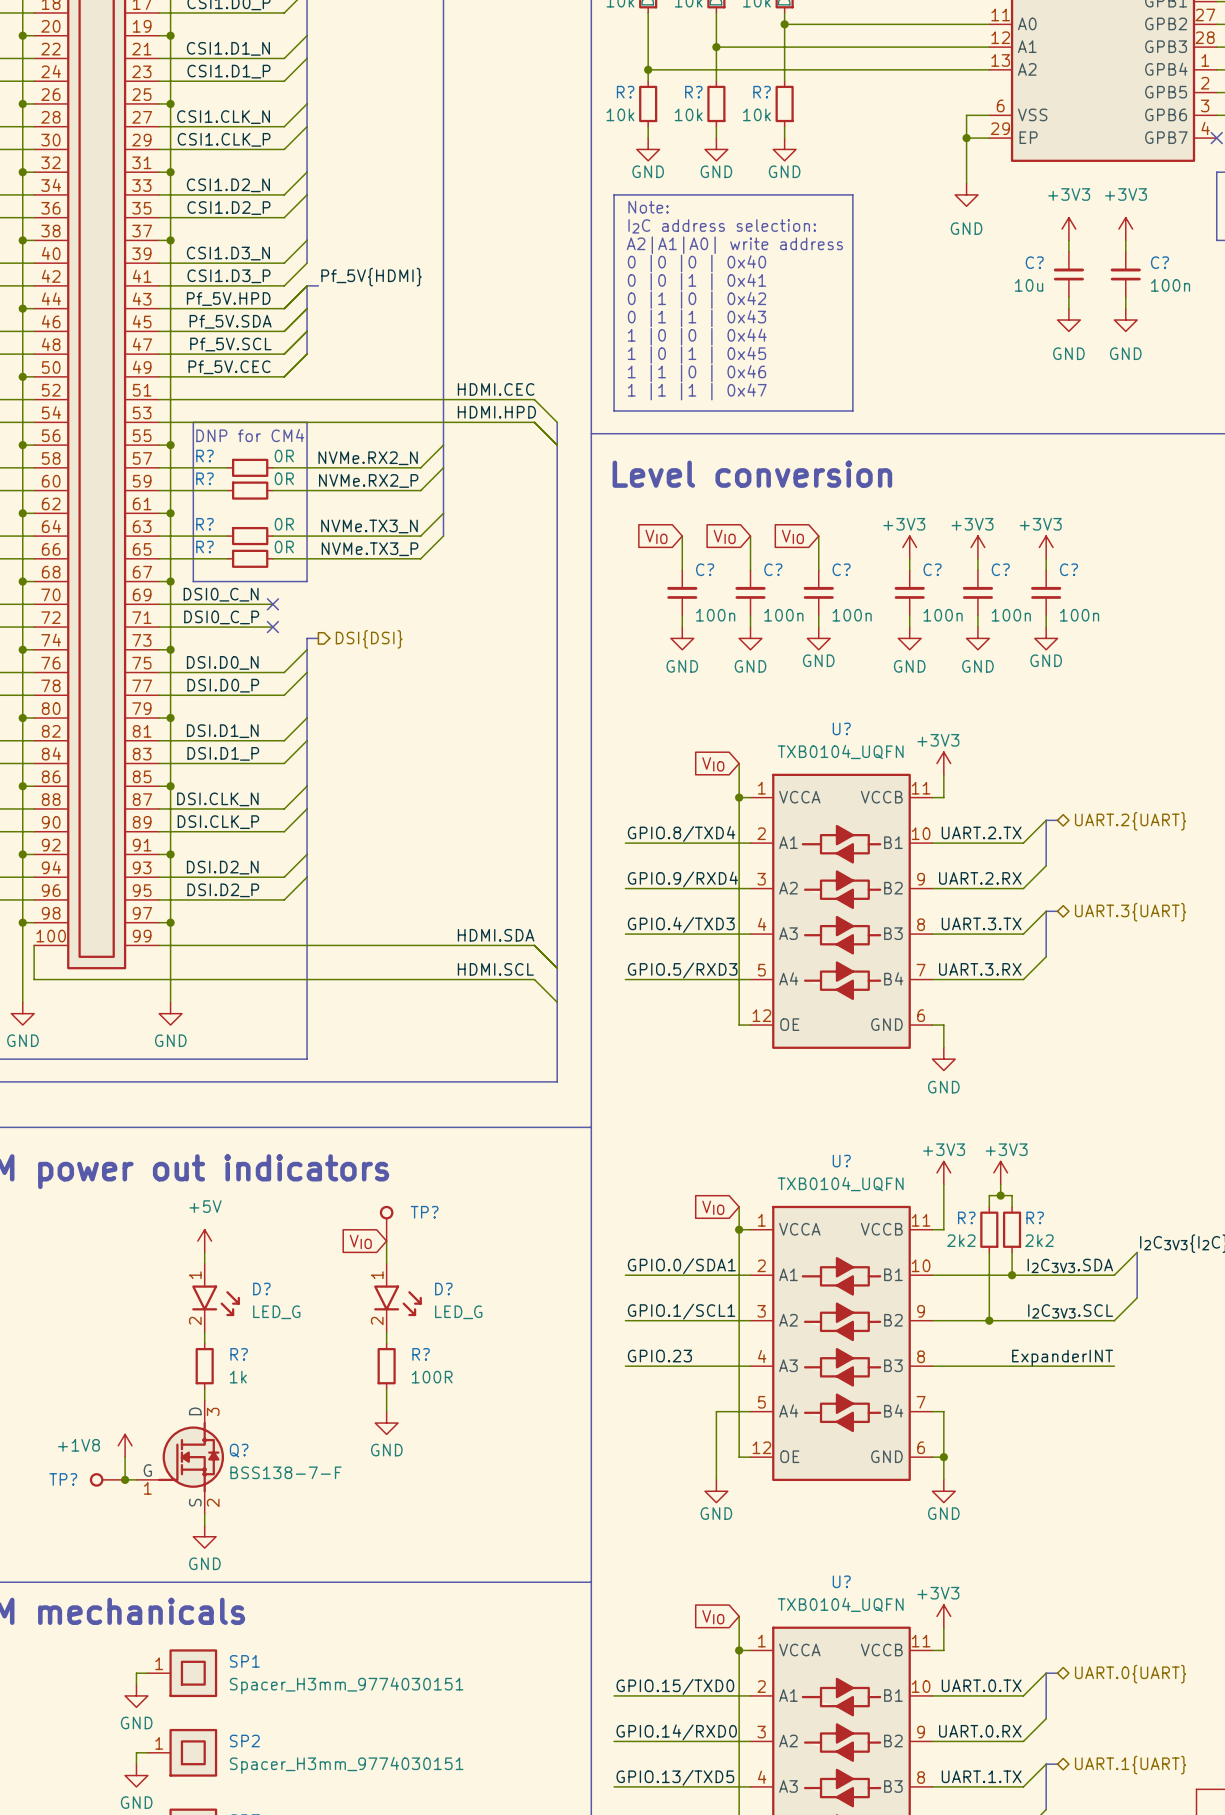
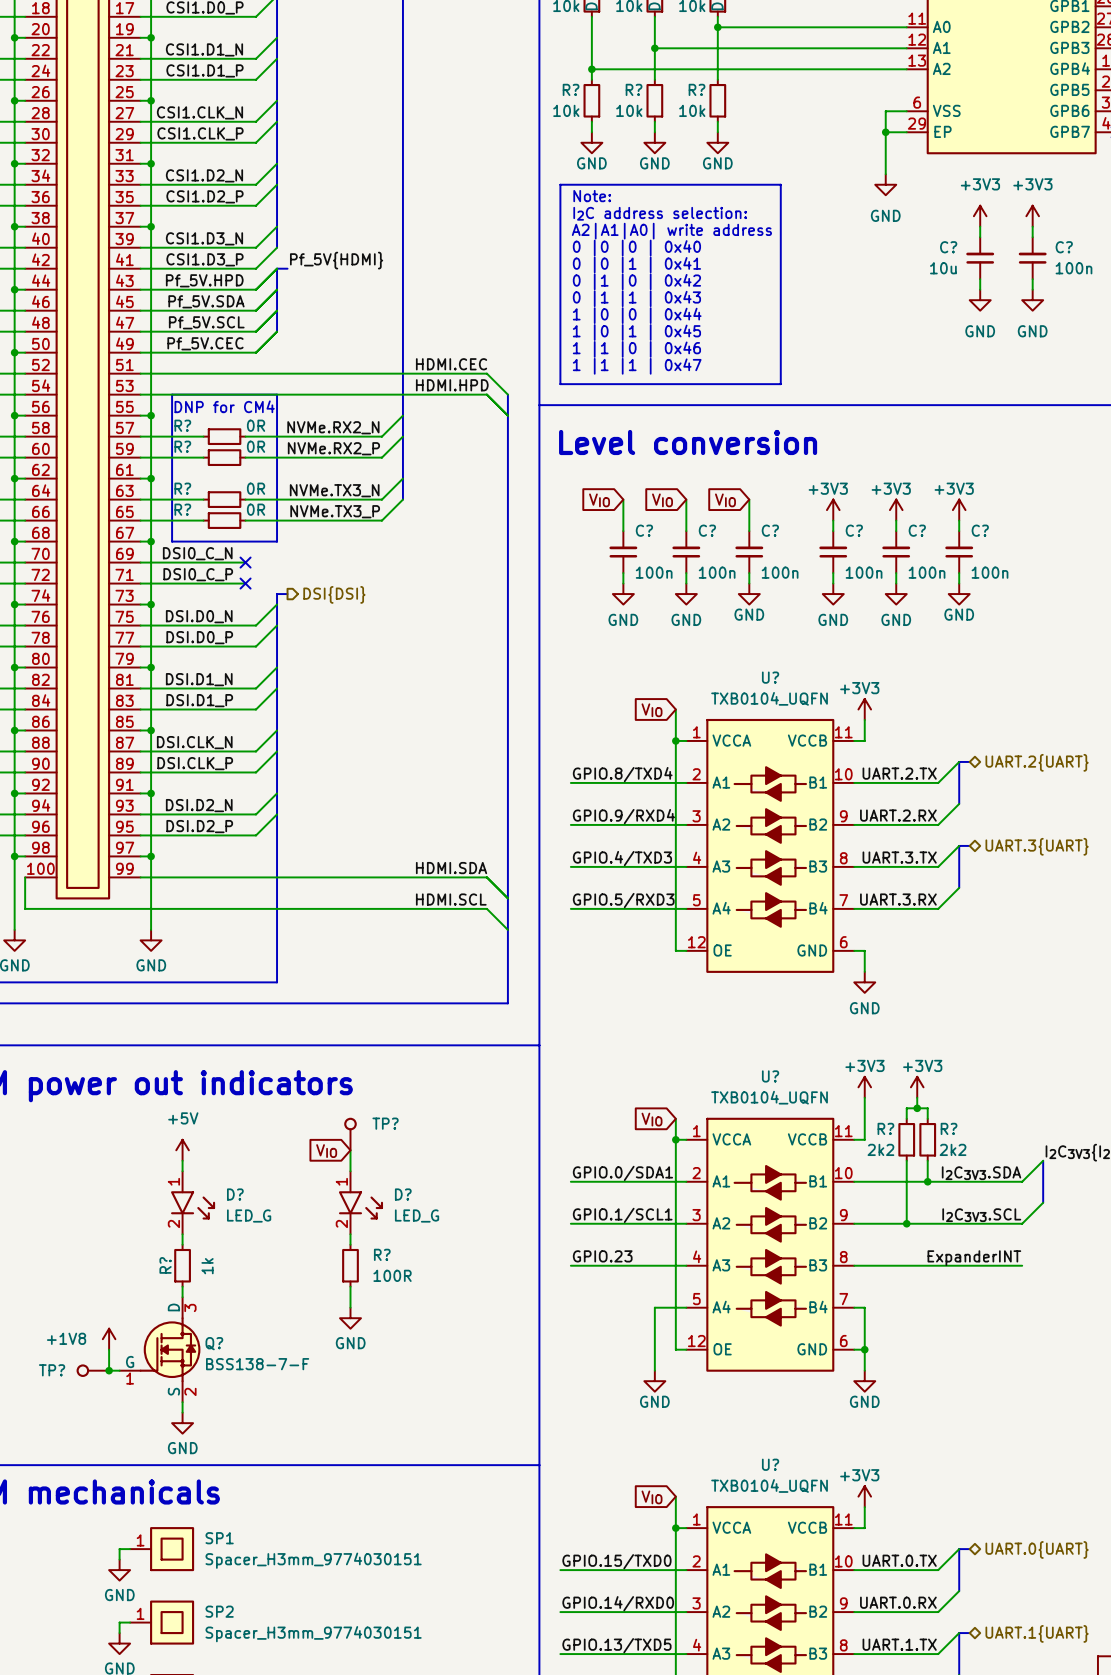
R? name rotation: 0° (239, 1354) -> 90° counterclockwise (165, 1265)
R? name position: R? (239, 1354) -> R? (165, 1265)
R? text rotation: 0° (238, 1377) -> 90° counterclockwise (207, 1266)

